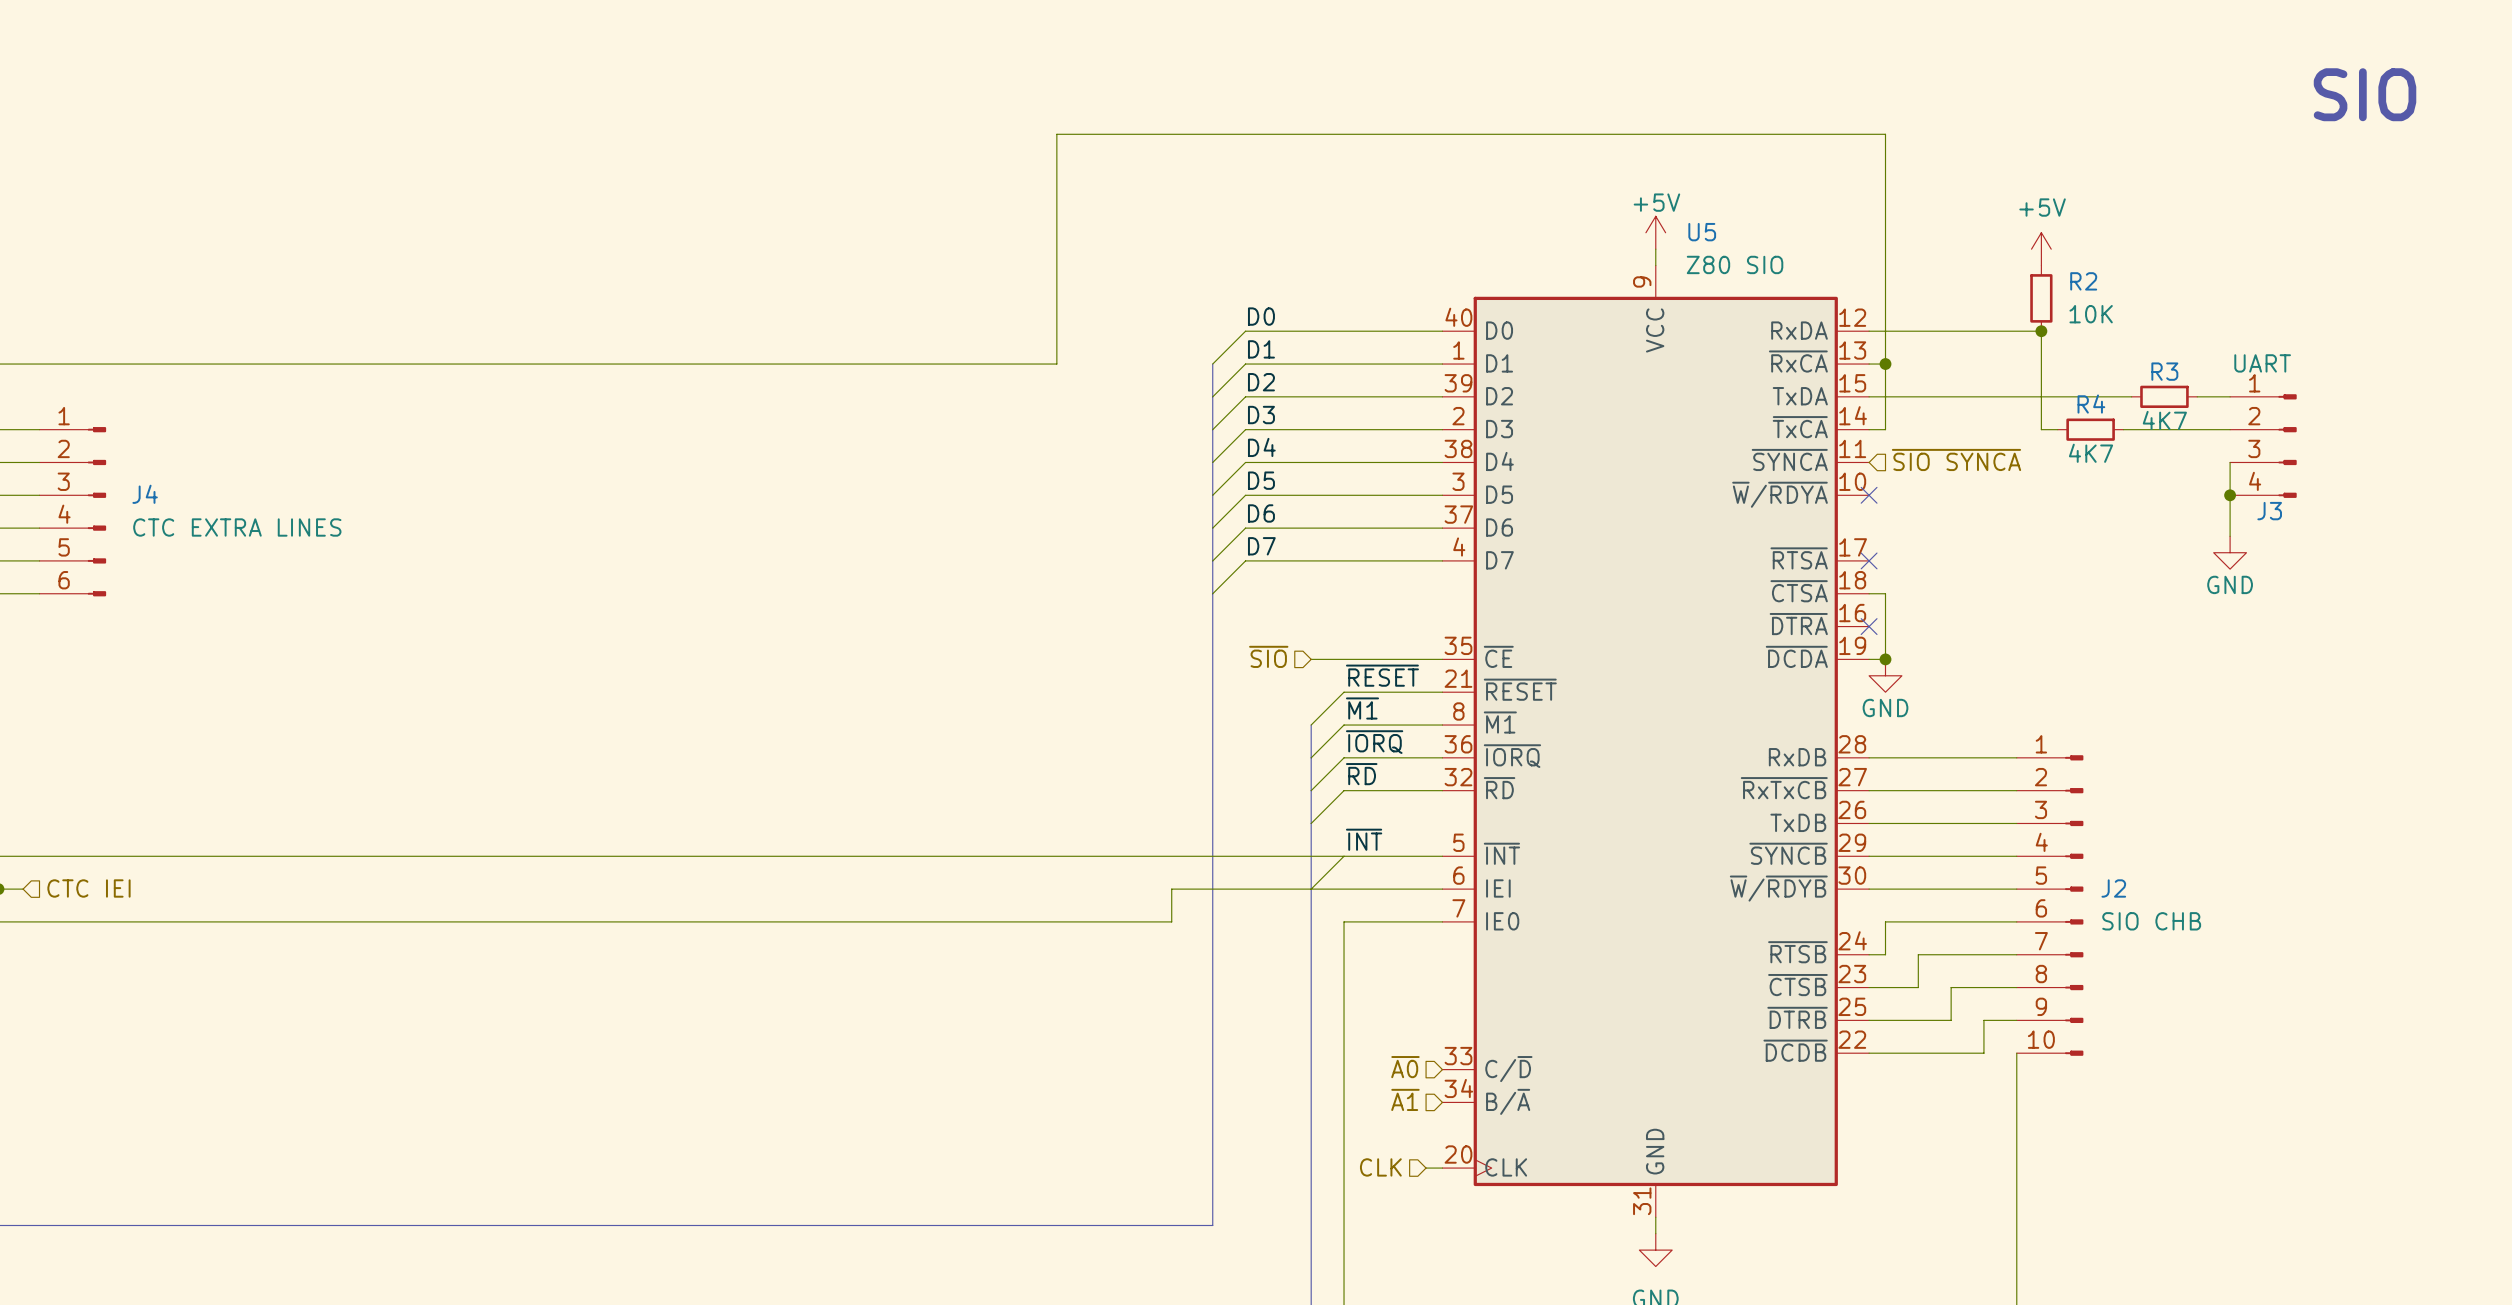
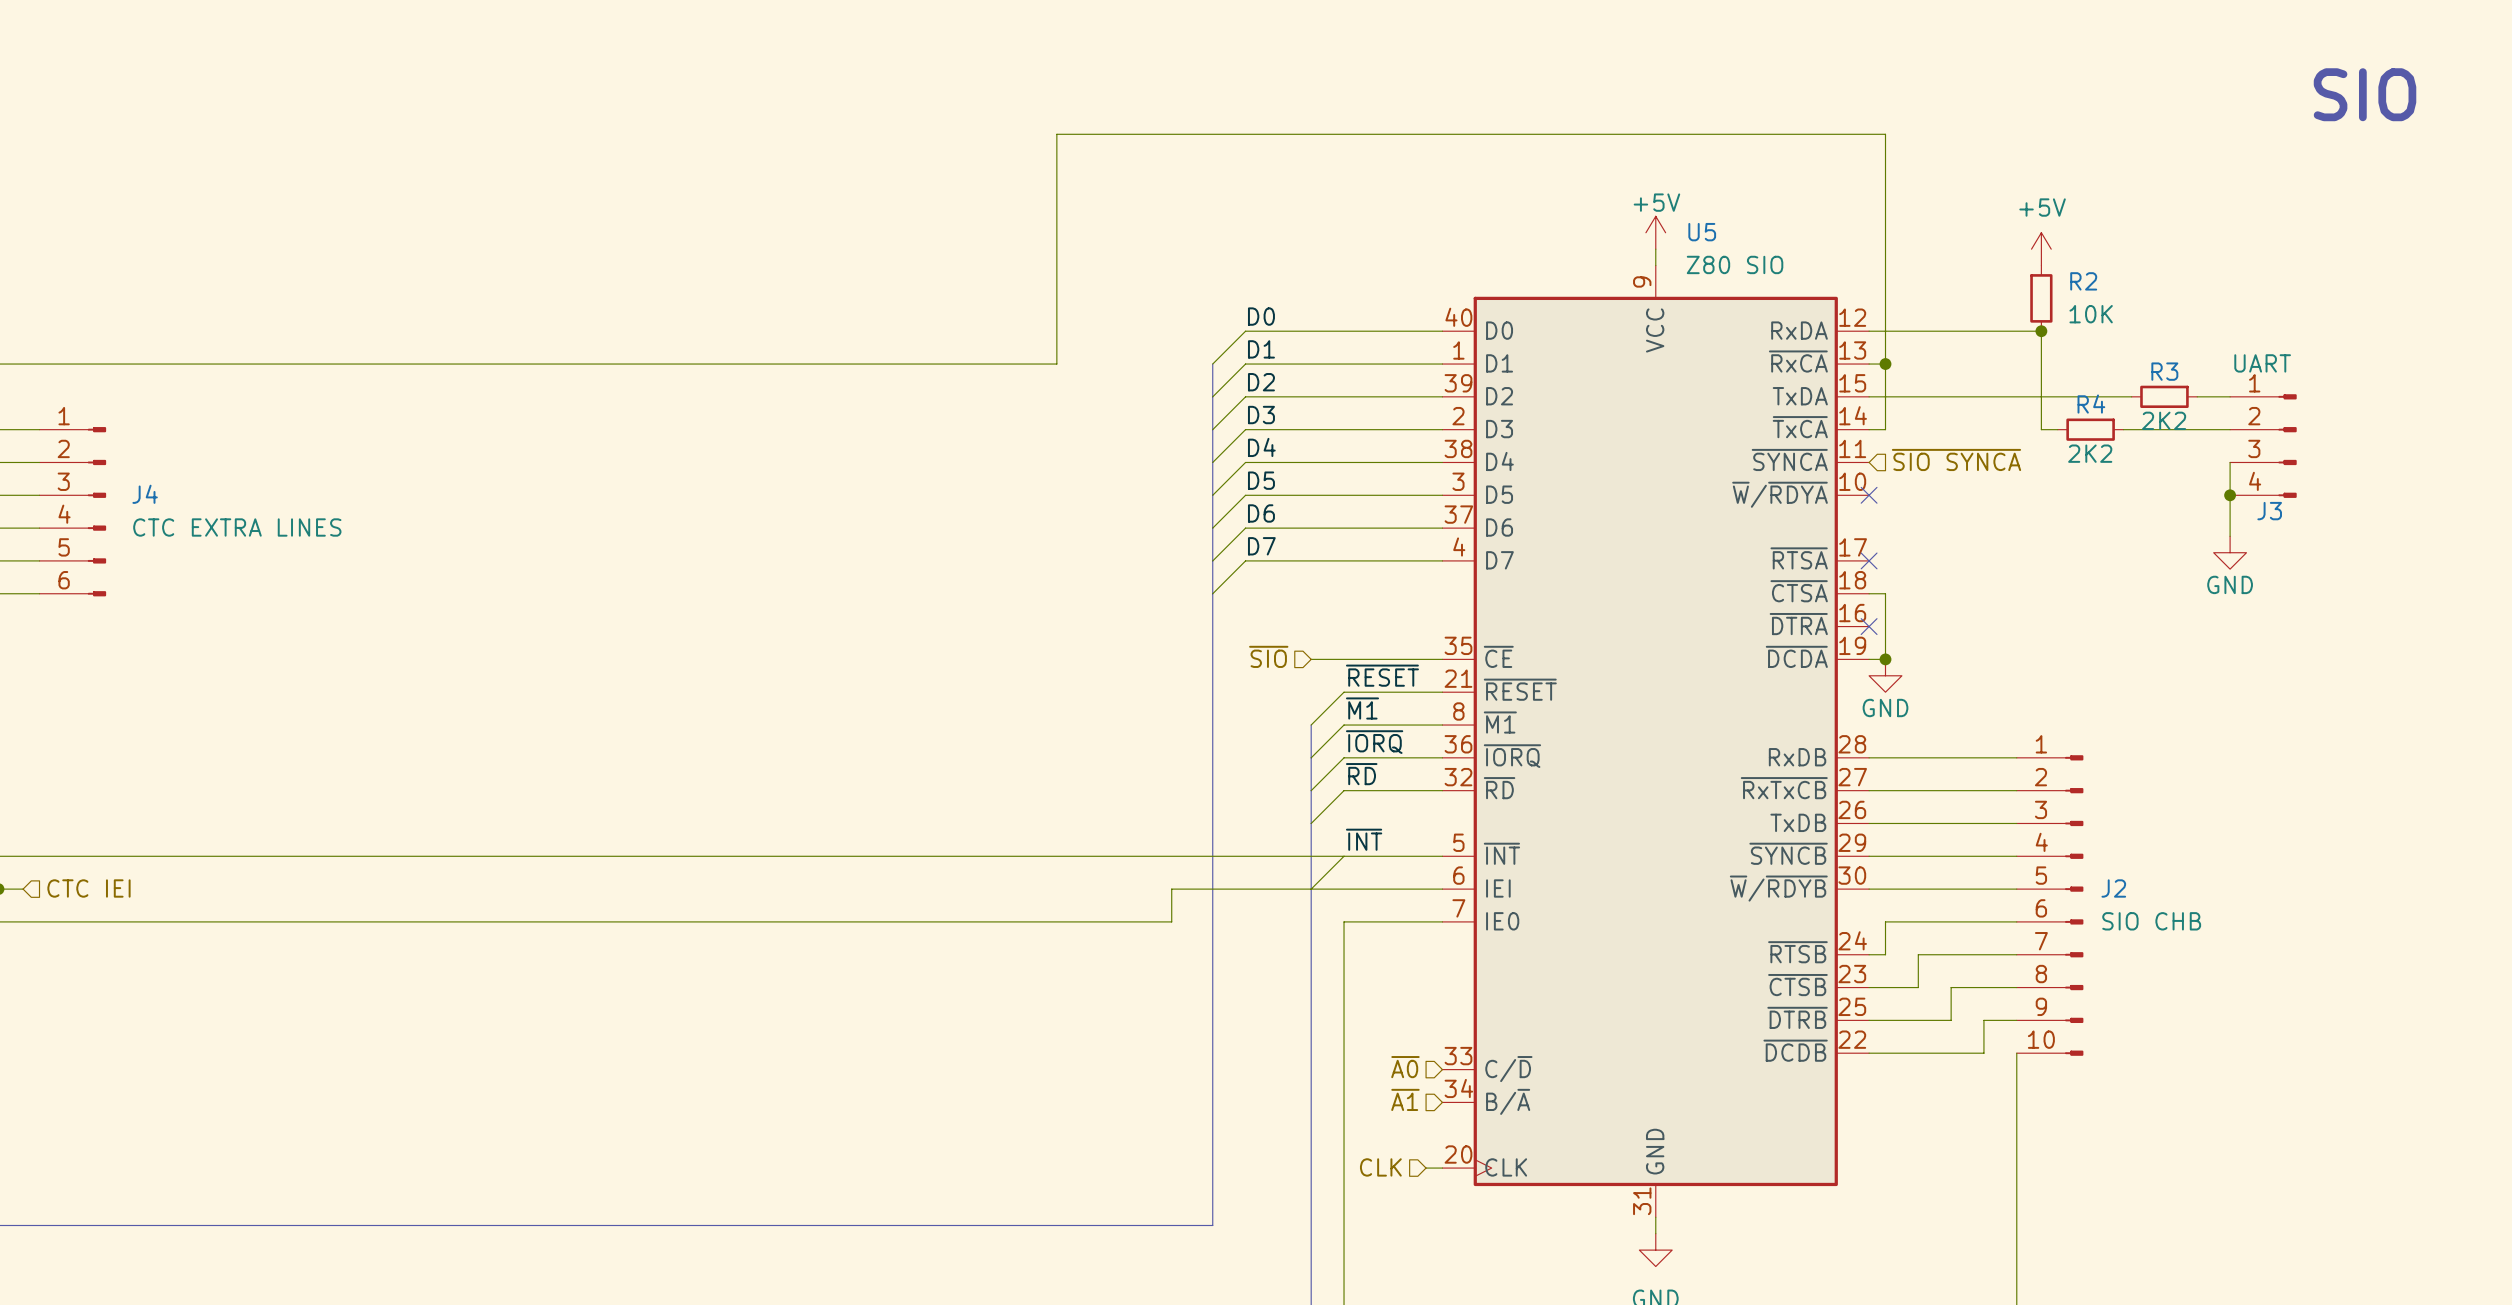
R3 value: 4K7 (2164, 420) -> 2K2 (2164, 420)
R4 value: 4K7 (2091, 453) -> 2K2 (2090, 453)

